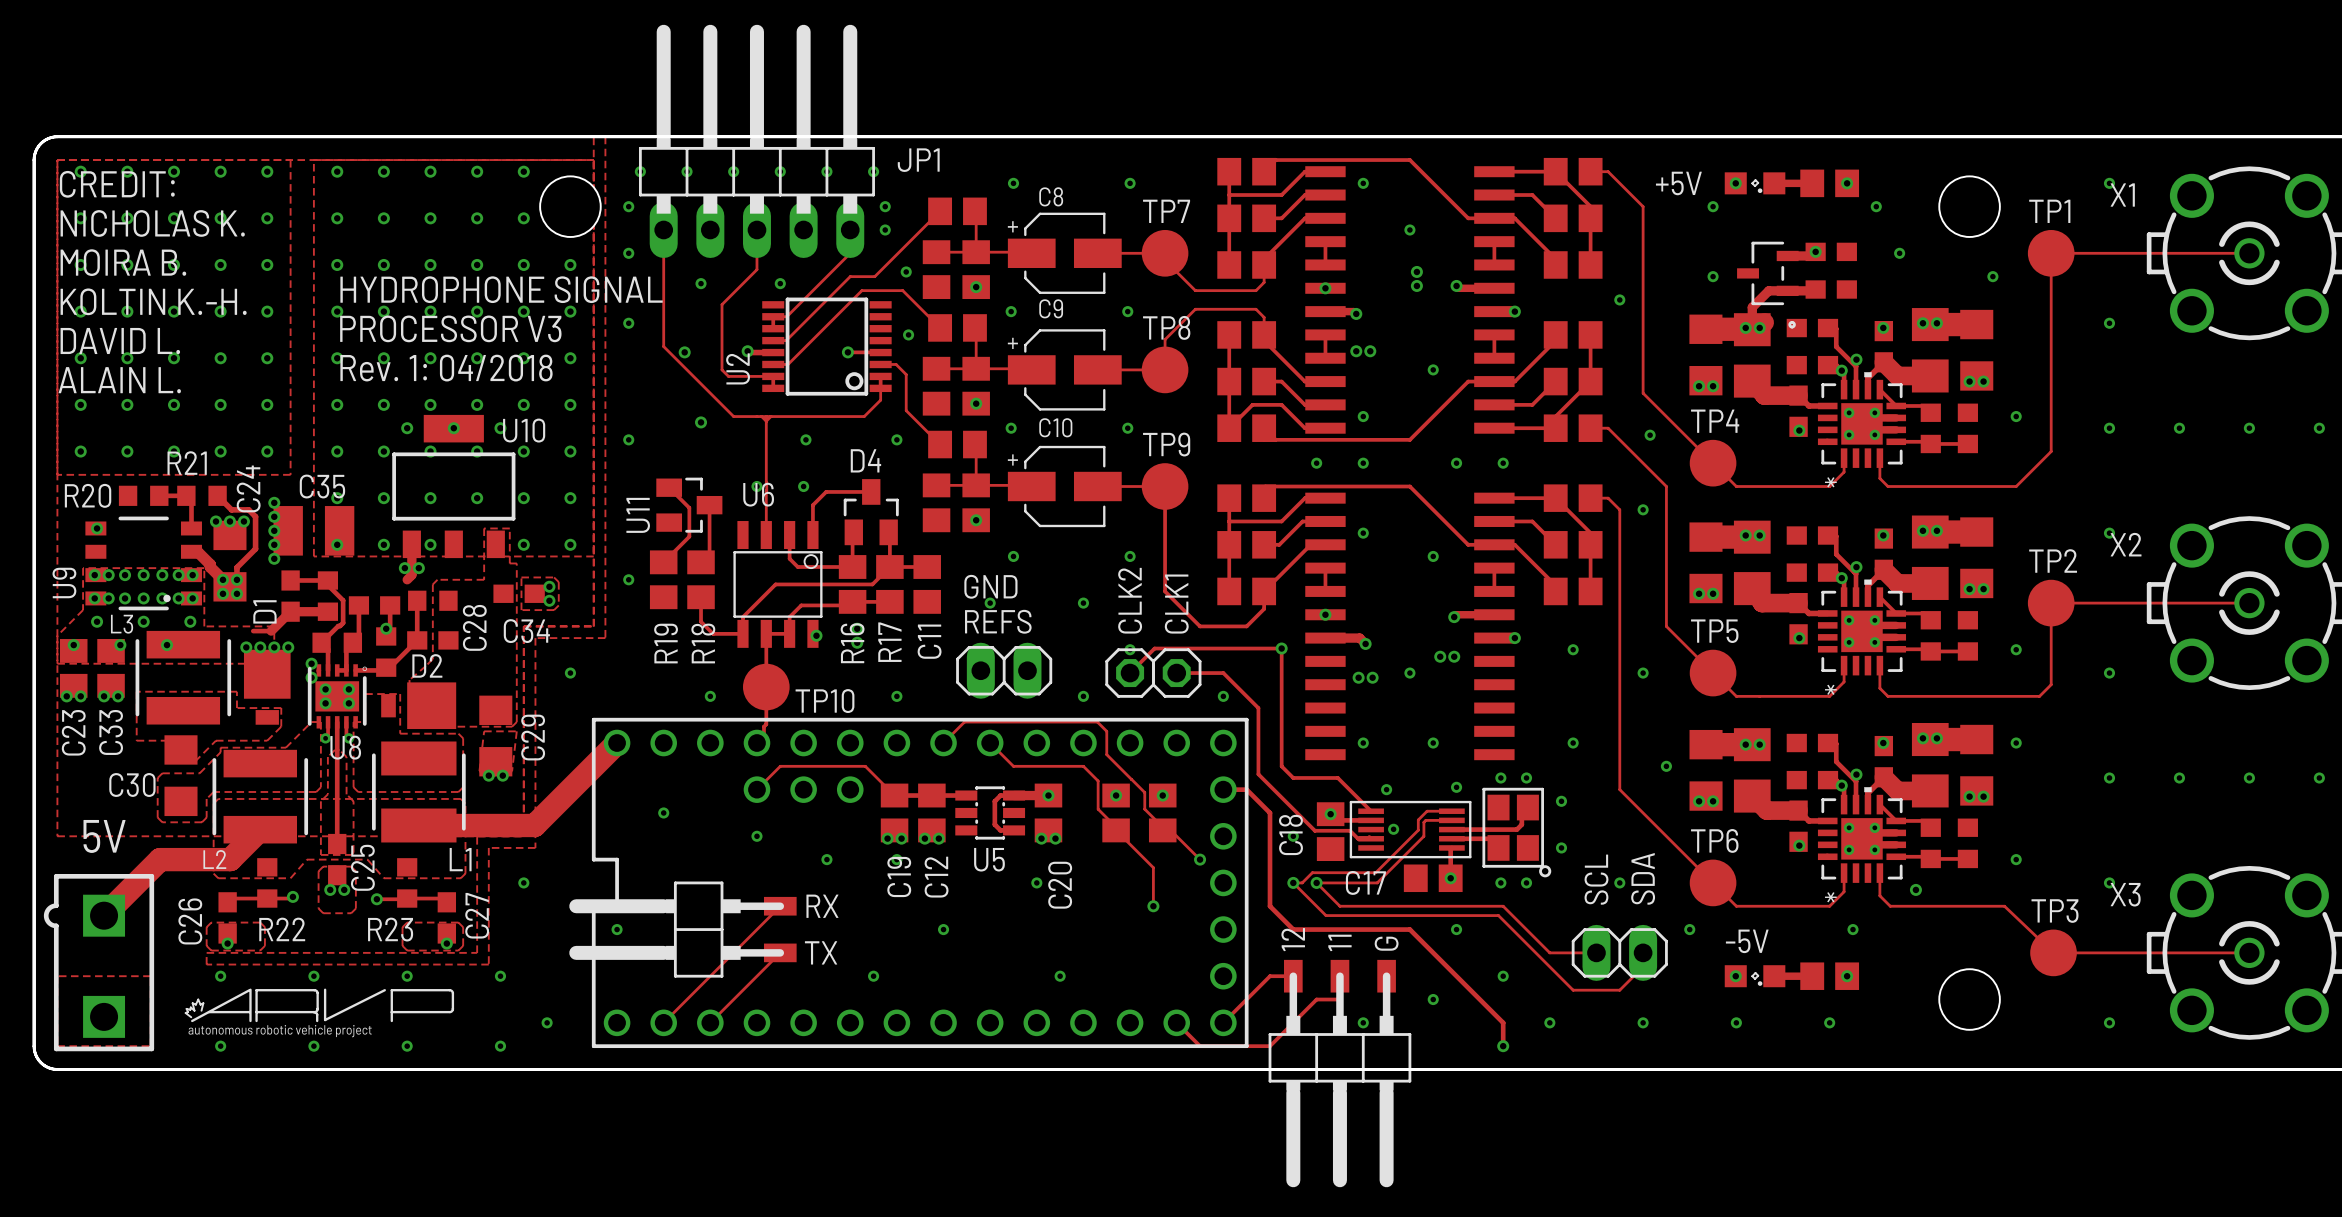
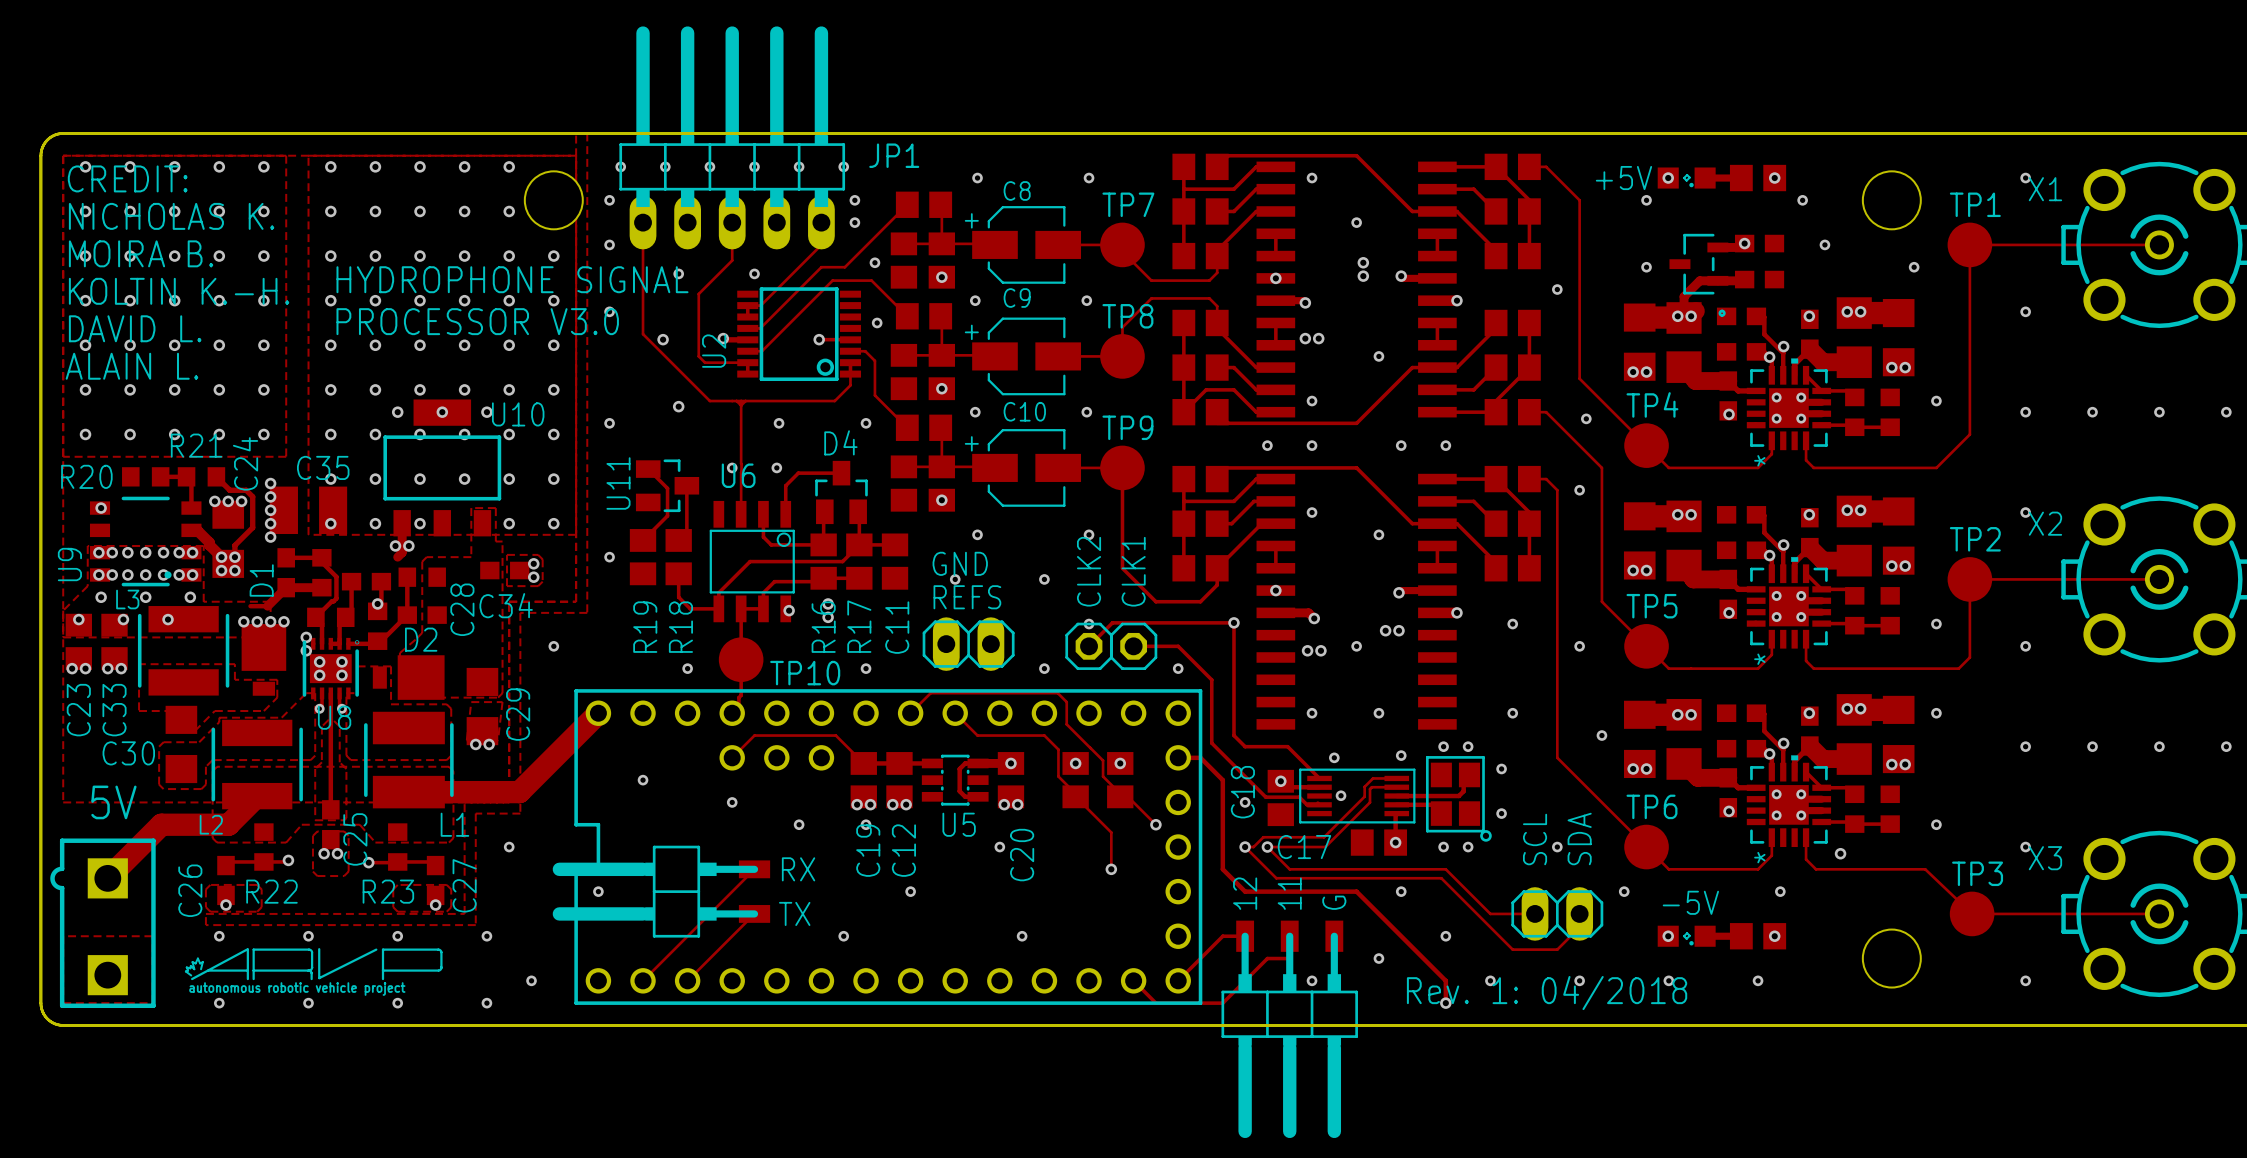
text: PROCESSOR V3 (450, 328) -> none
text: Rev. 1: 04/2018 (446, 368) -> PROCESSOR V3.0 (477, 321)
text: none -> Rev. 1: 04/2018 (1547, 993)

